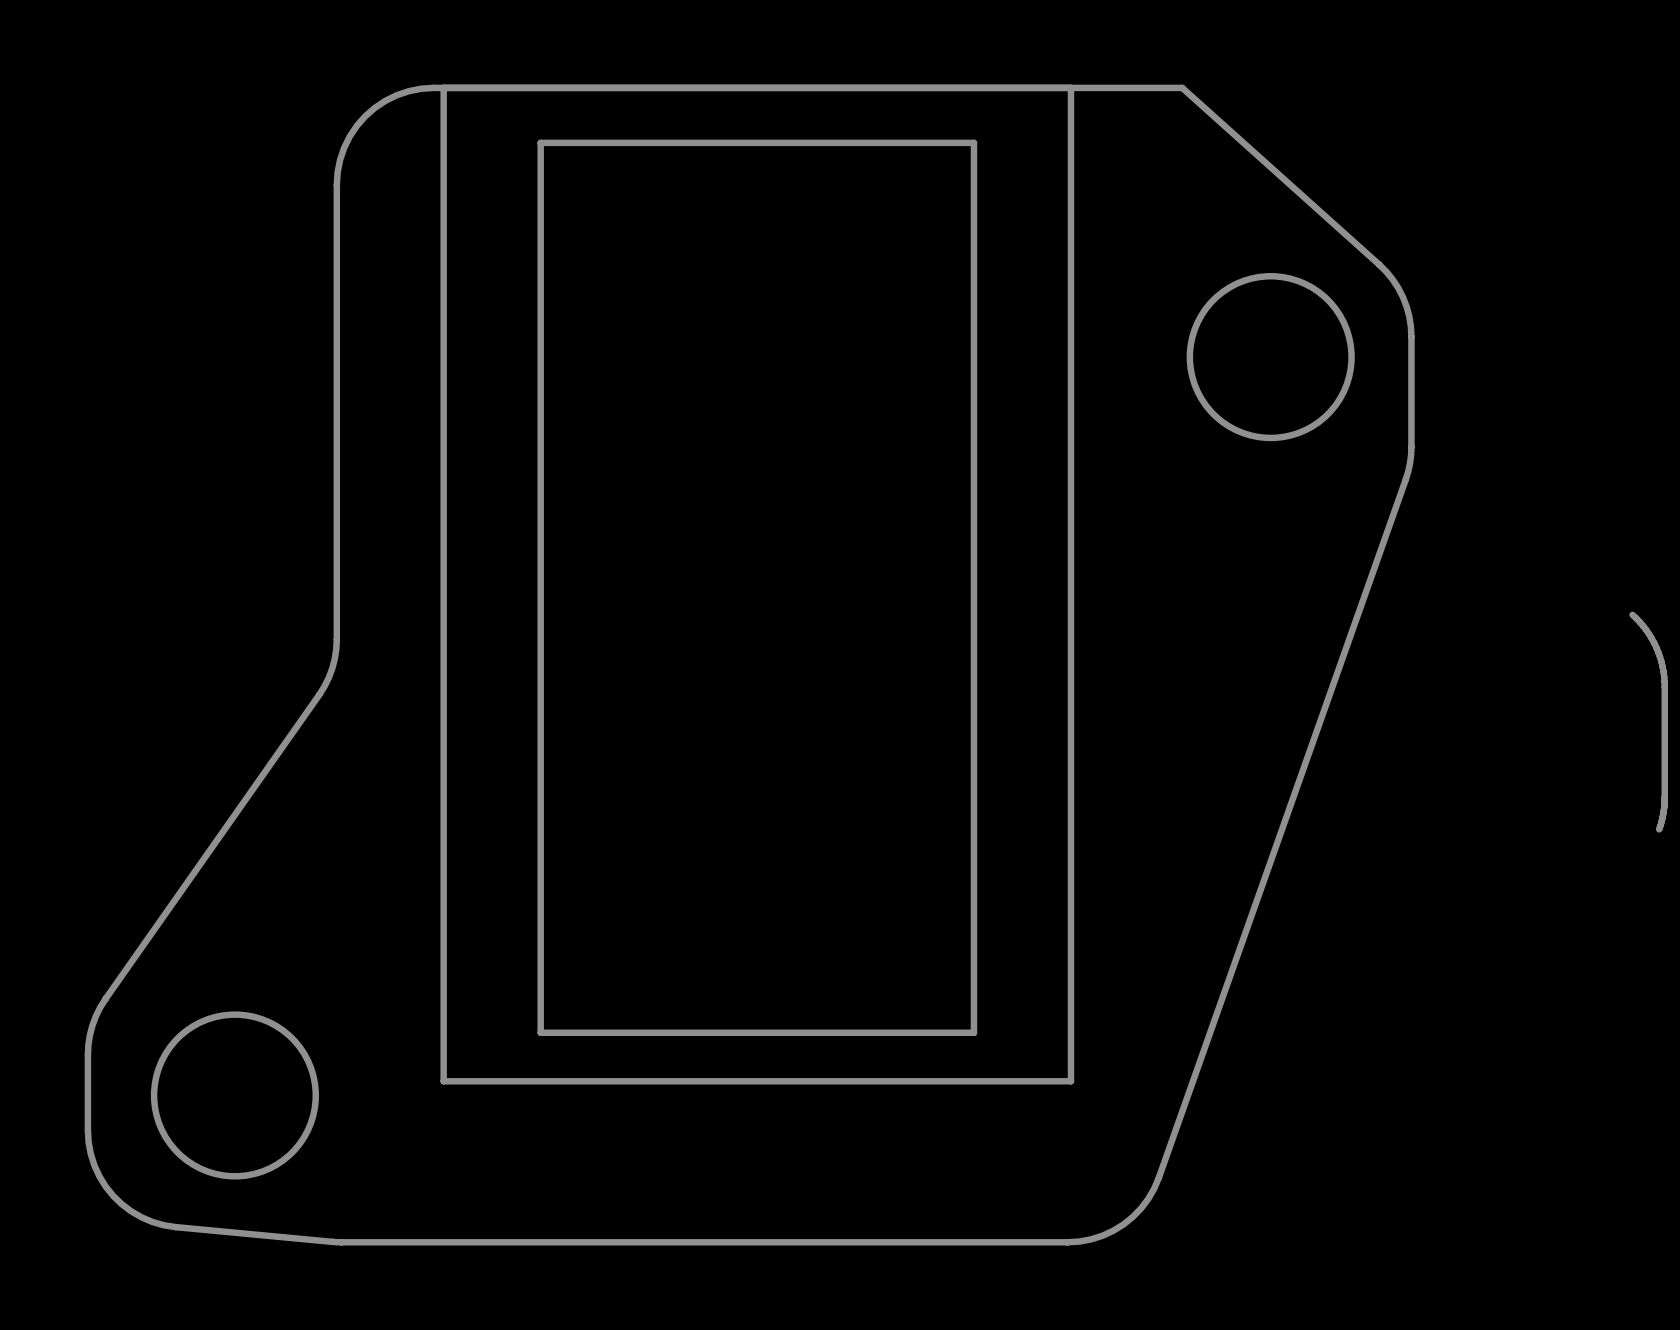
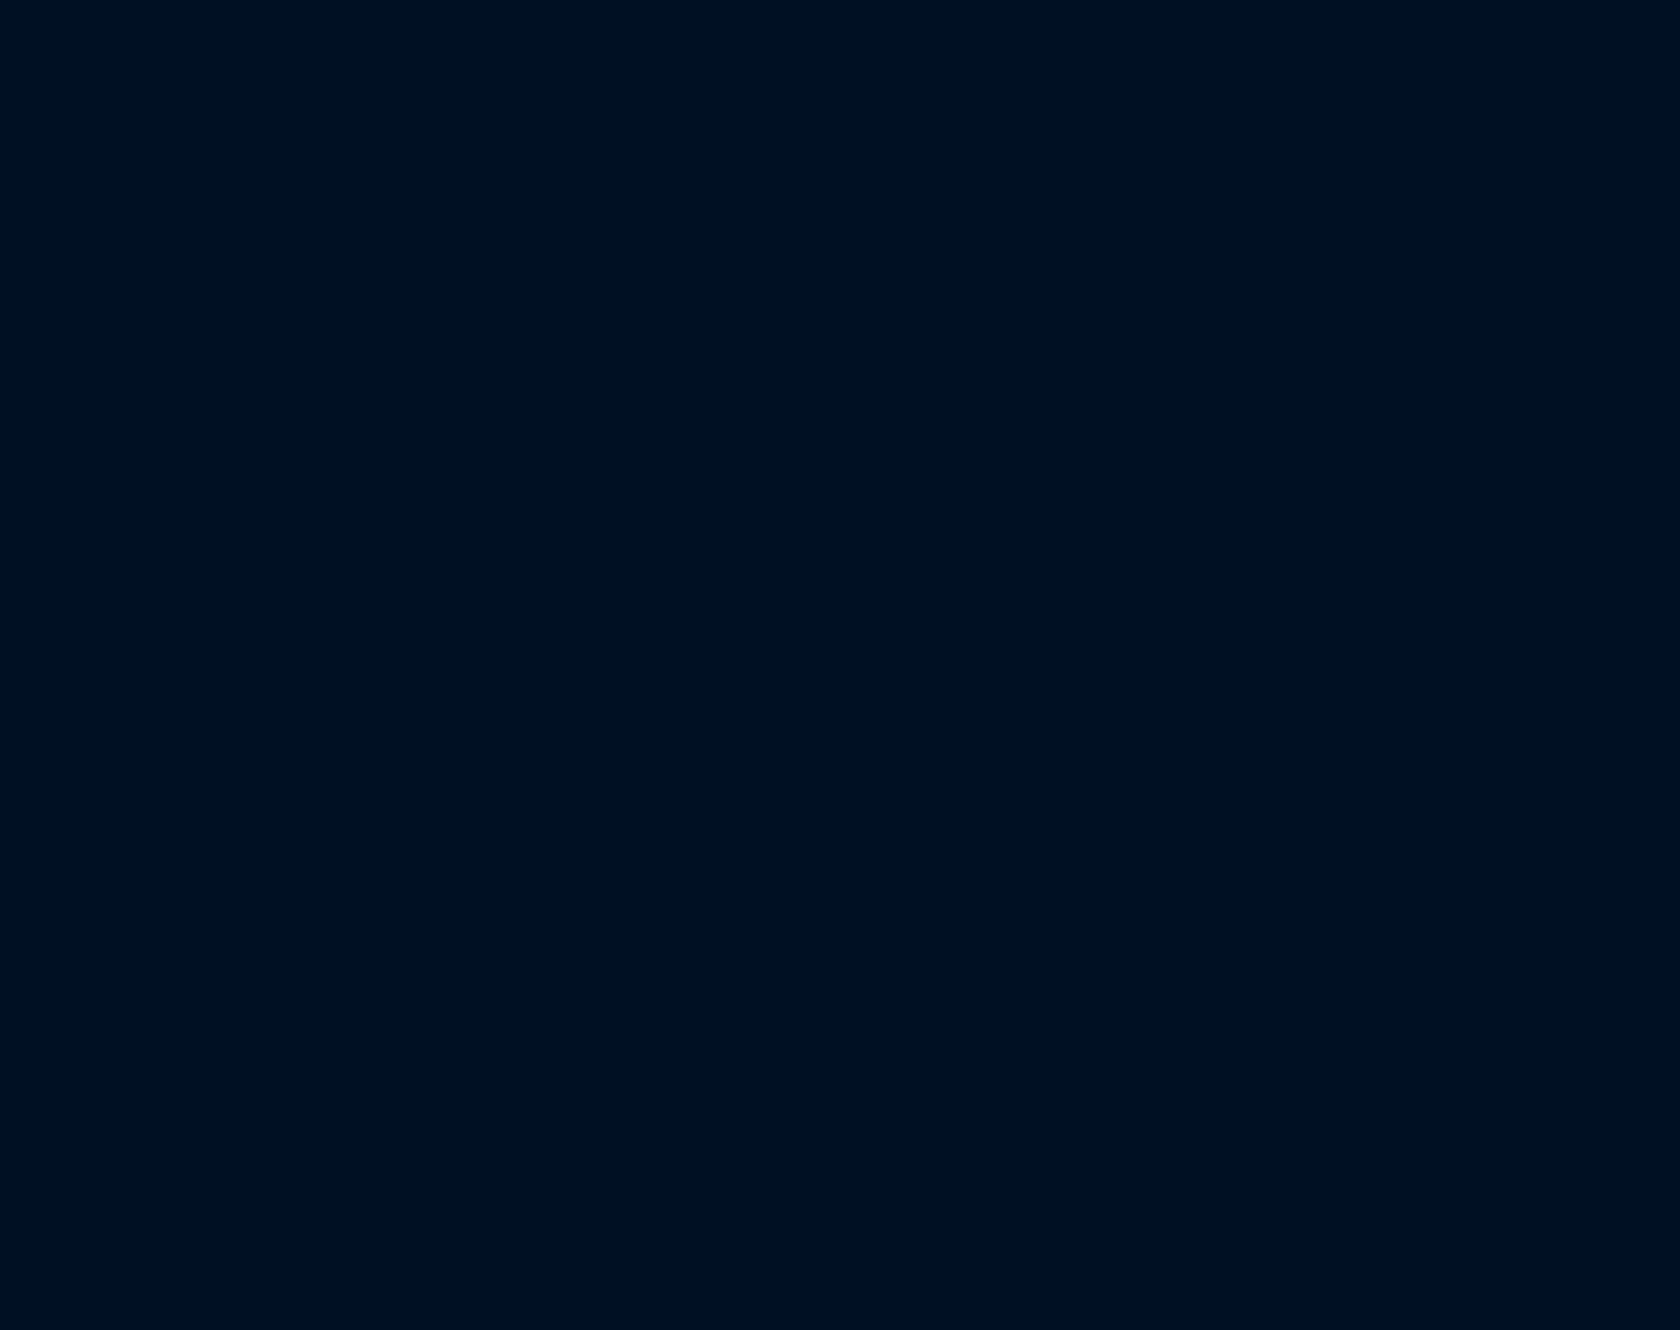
line: (433, 87) (1182, 87) (1379, 264) (1398, 288) (1406, 306) (1410, 326) (1411, 446) (1408, 471) (1158, 1177) (1141, 1208) (1113, 1230) (1091, 1239) (1067, 1242) (336, 1242) (164, 1225) (141, 1217) (121, 1204) (99, 1176) (90, 1154) (87, 1130) (88, 1044) (95, 1016) (105, 998) (319, 694) (332, 668) (336, 639) (337, 172) (340, 159) (349, 136) (356, 125) (374, 107) (385, 100) (408, 91) (433, 87) -> none
line: (443, 87) (443, 1081) (1070, 1081) (1070, 87) -> none
line: (540, 142) (973, 142) (973, 1032) (540, 1032) (540, 142) -> none
drawing: [1186, 273, 1355, 442] -> none
line: (1632, 614) (1643, 625) (1654, 642) (1661, 661) (1664, 676) (1664, 801) (1659, 829) -> none
drawing: [150, 1011, 320, 1180] -> none

